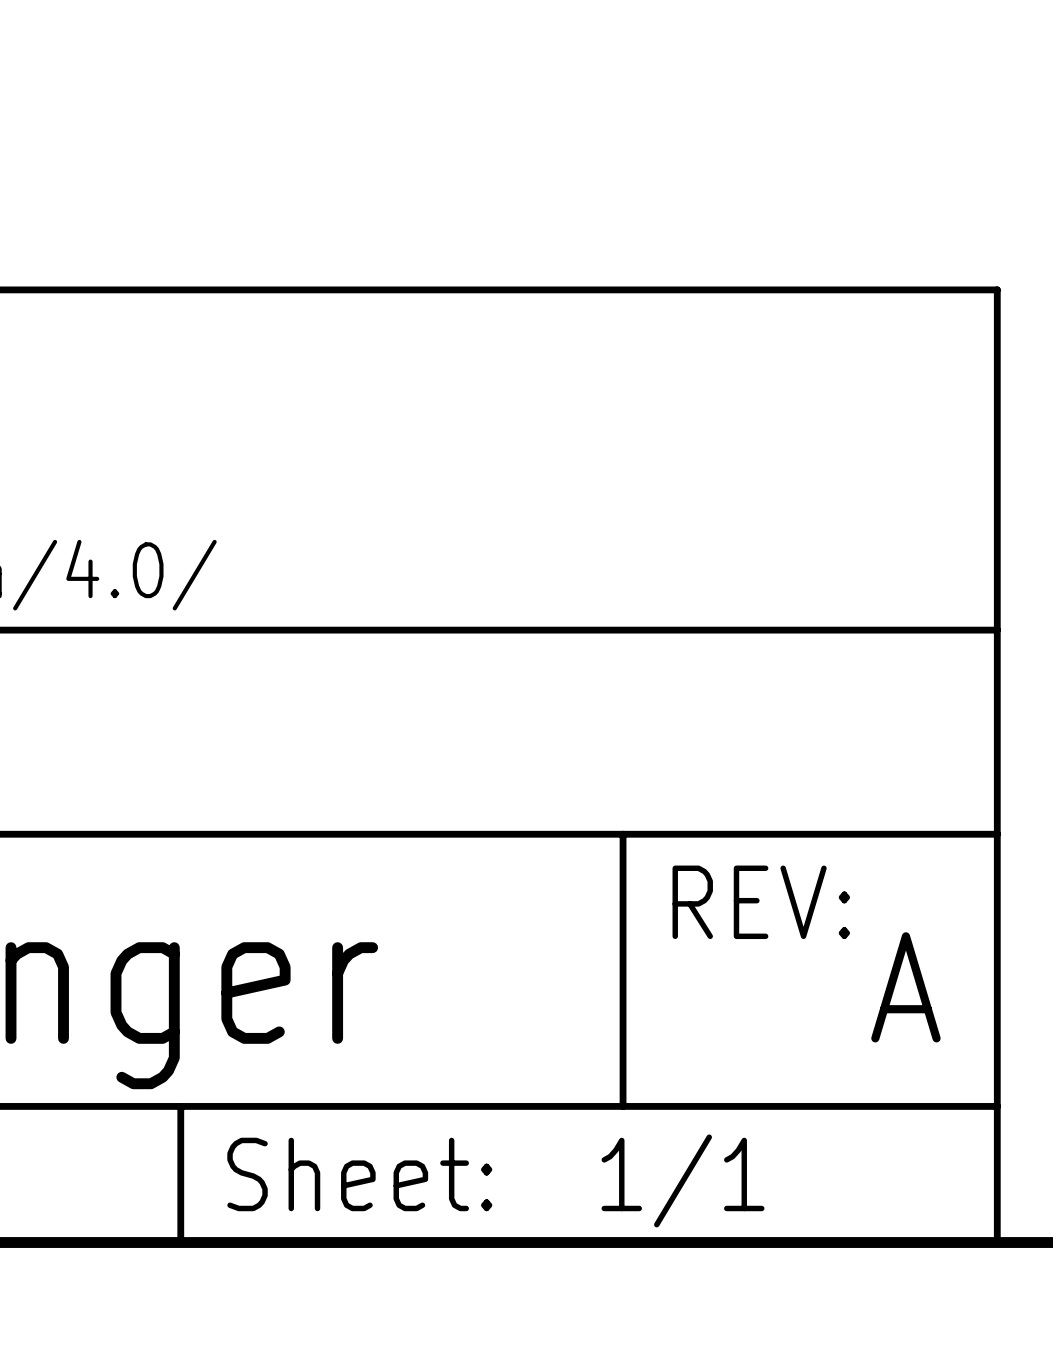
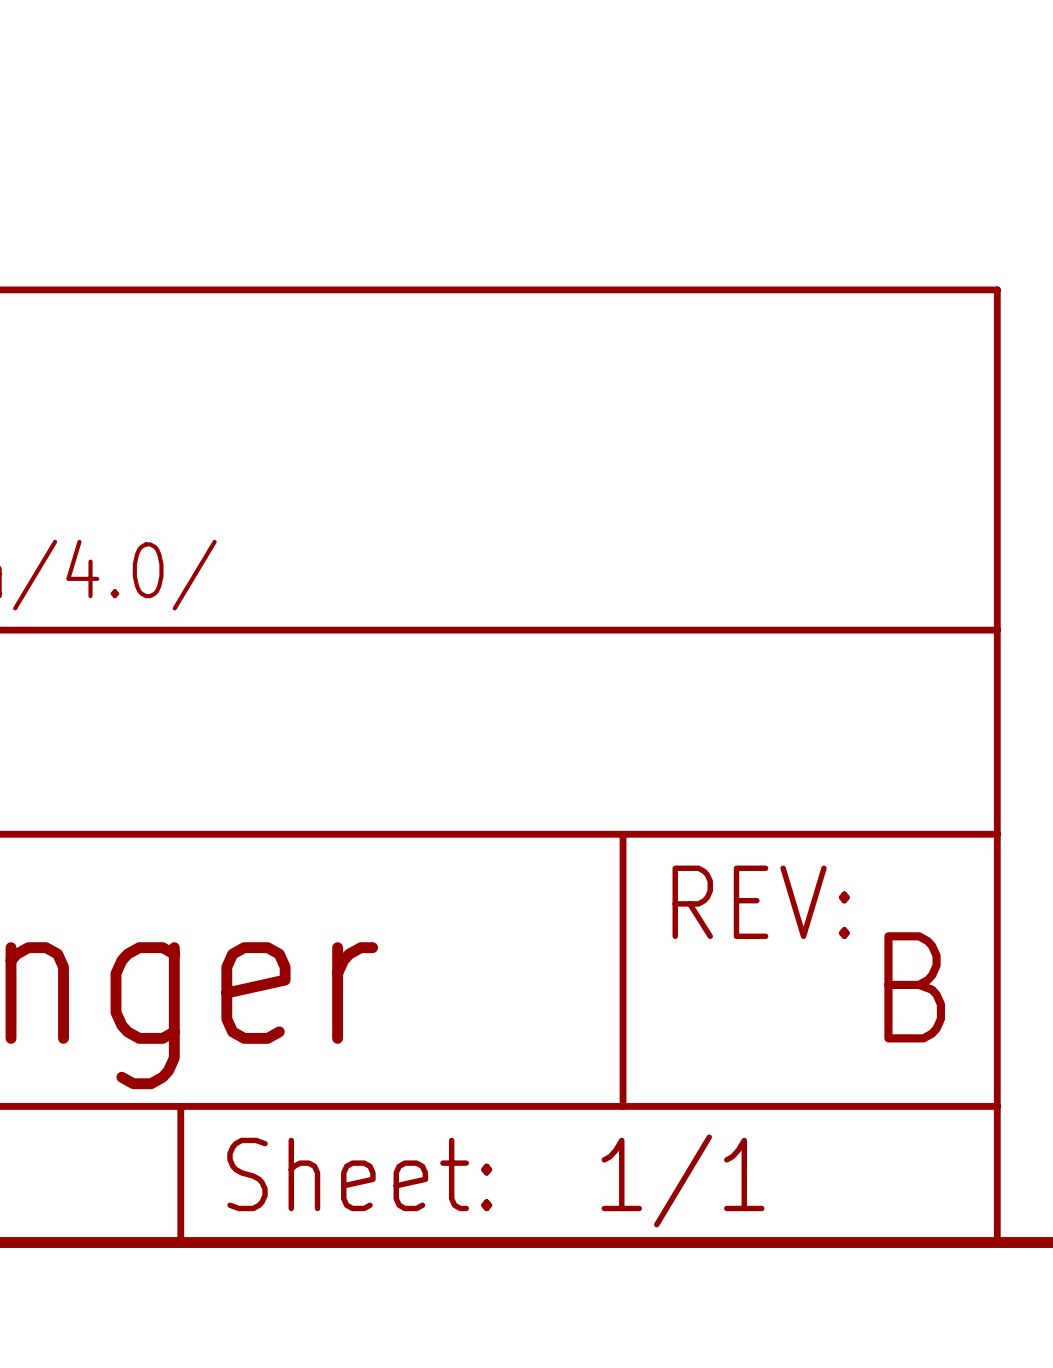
text: A (905, 987) -> B (914, 987)

